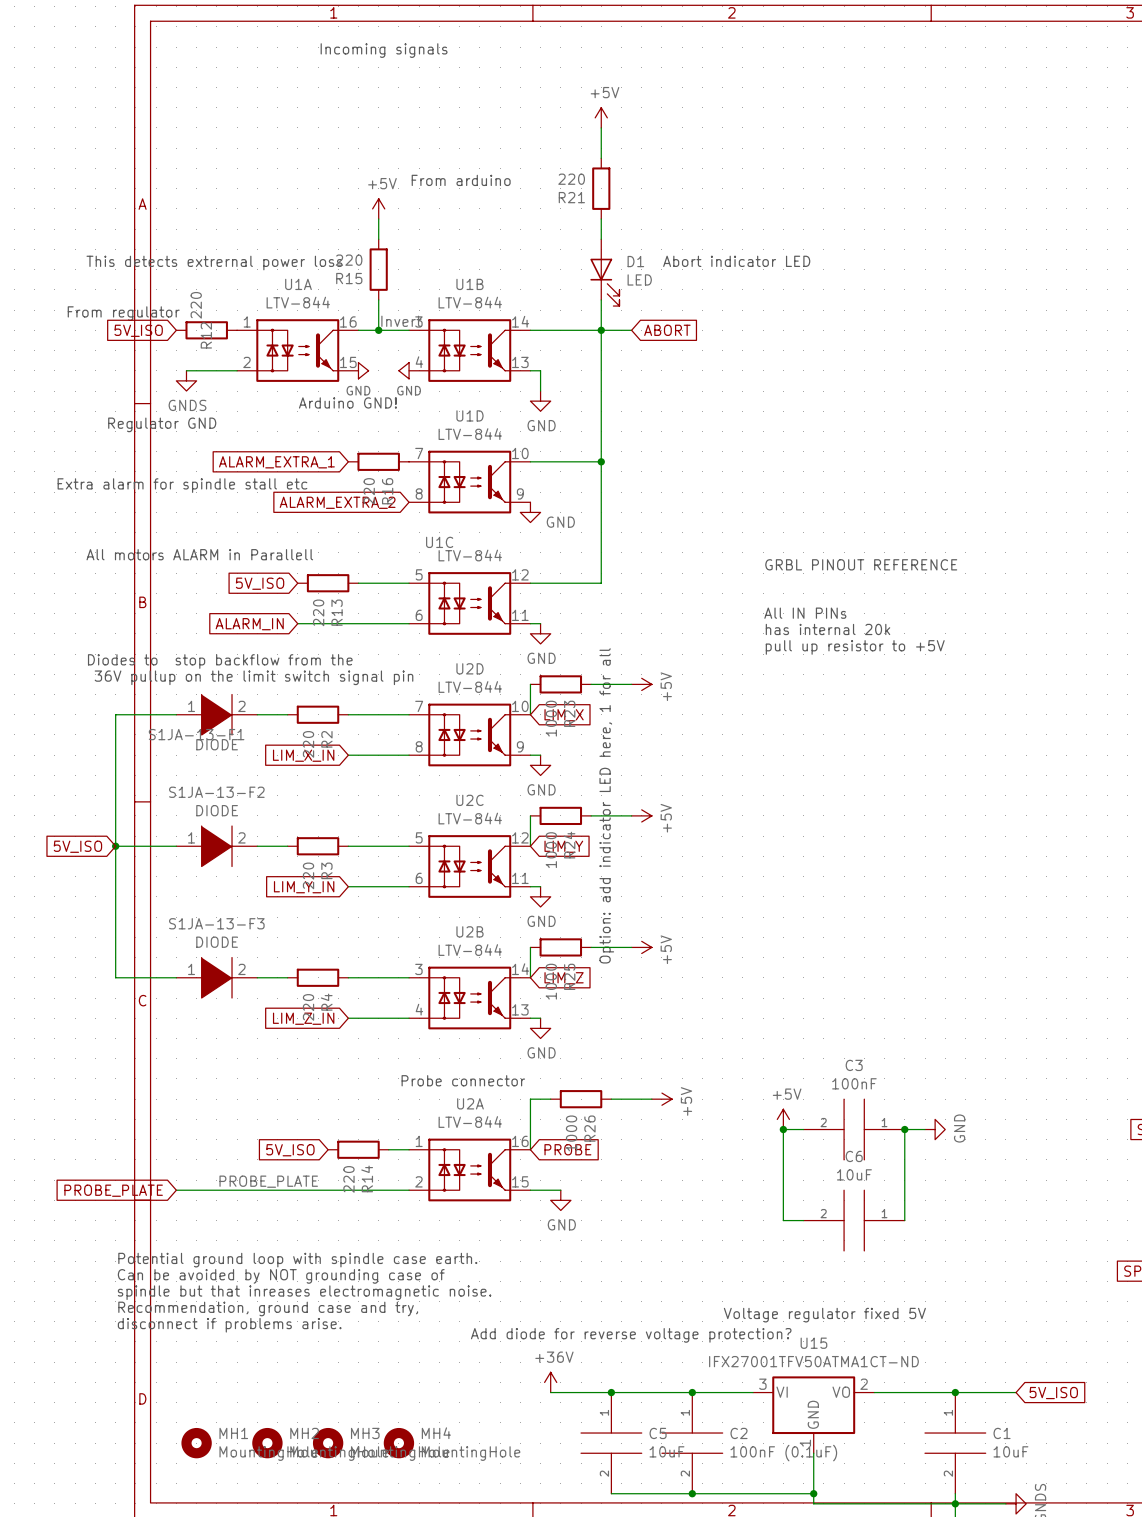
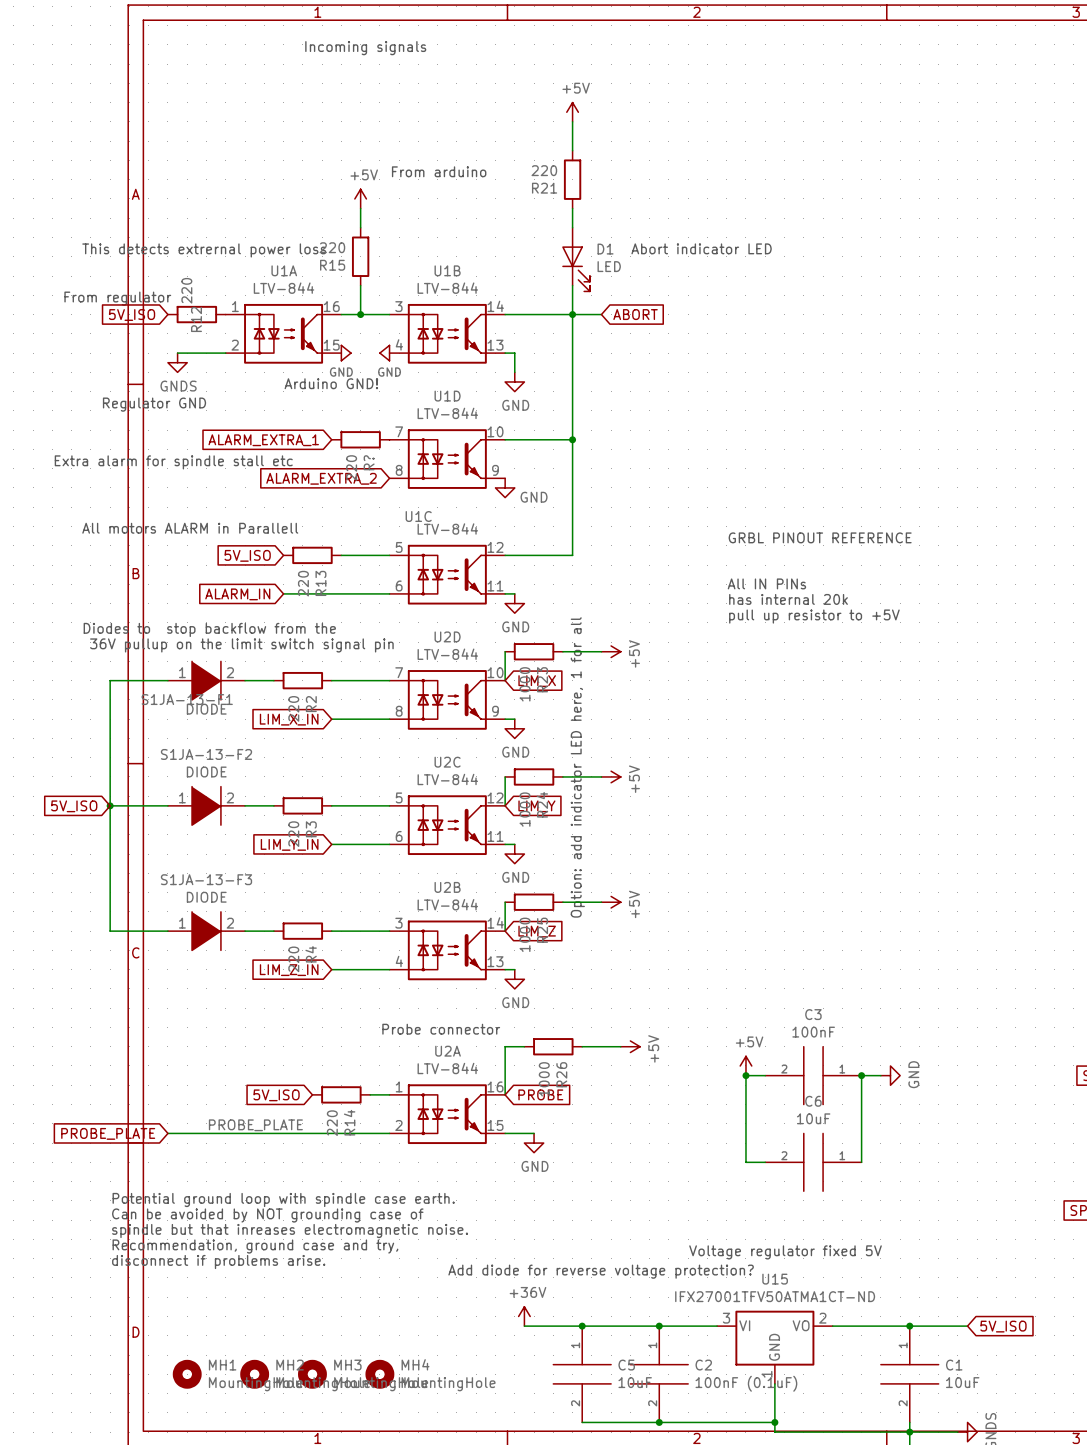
label: Invert (401, 321) -> none
R16 name: R16 (387, 491) -> R? (369, 462)

